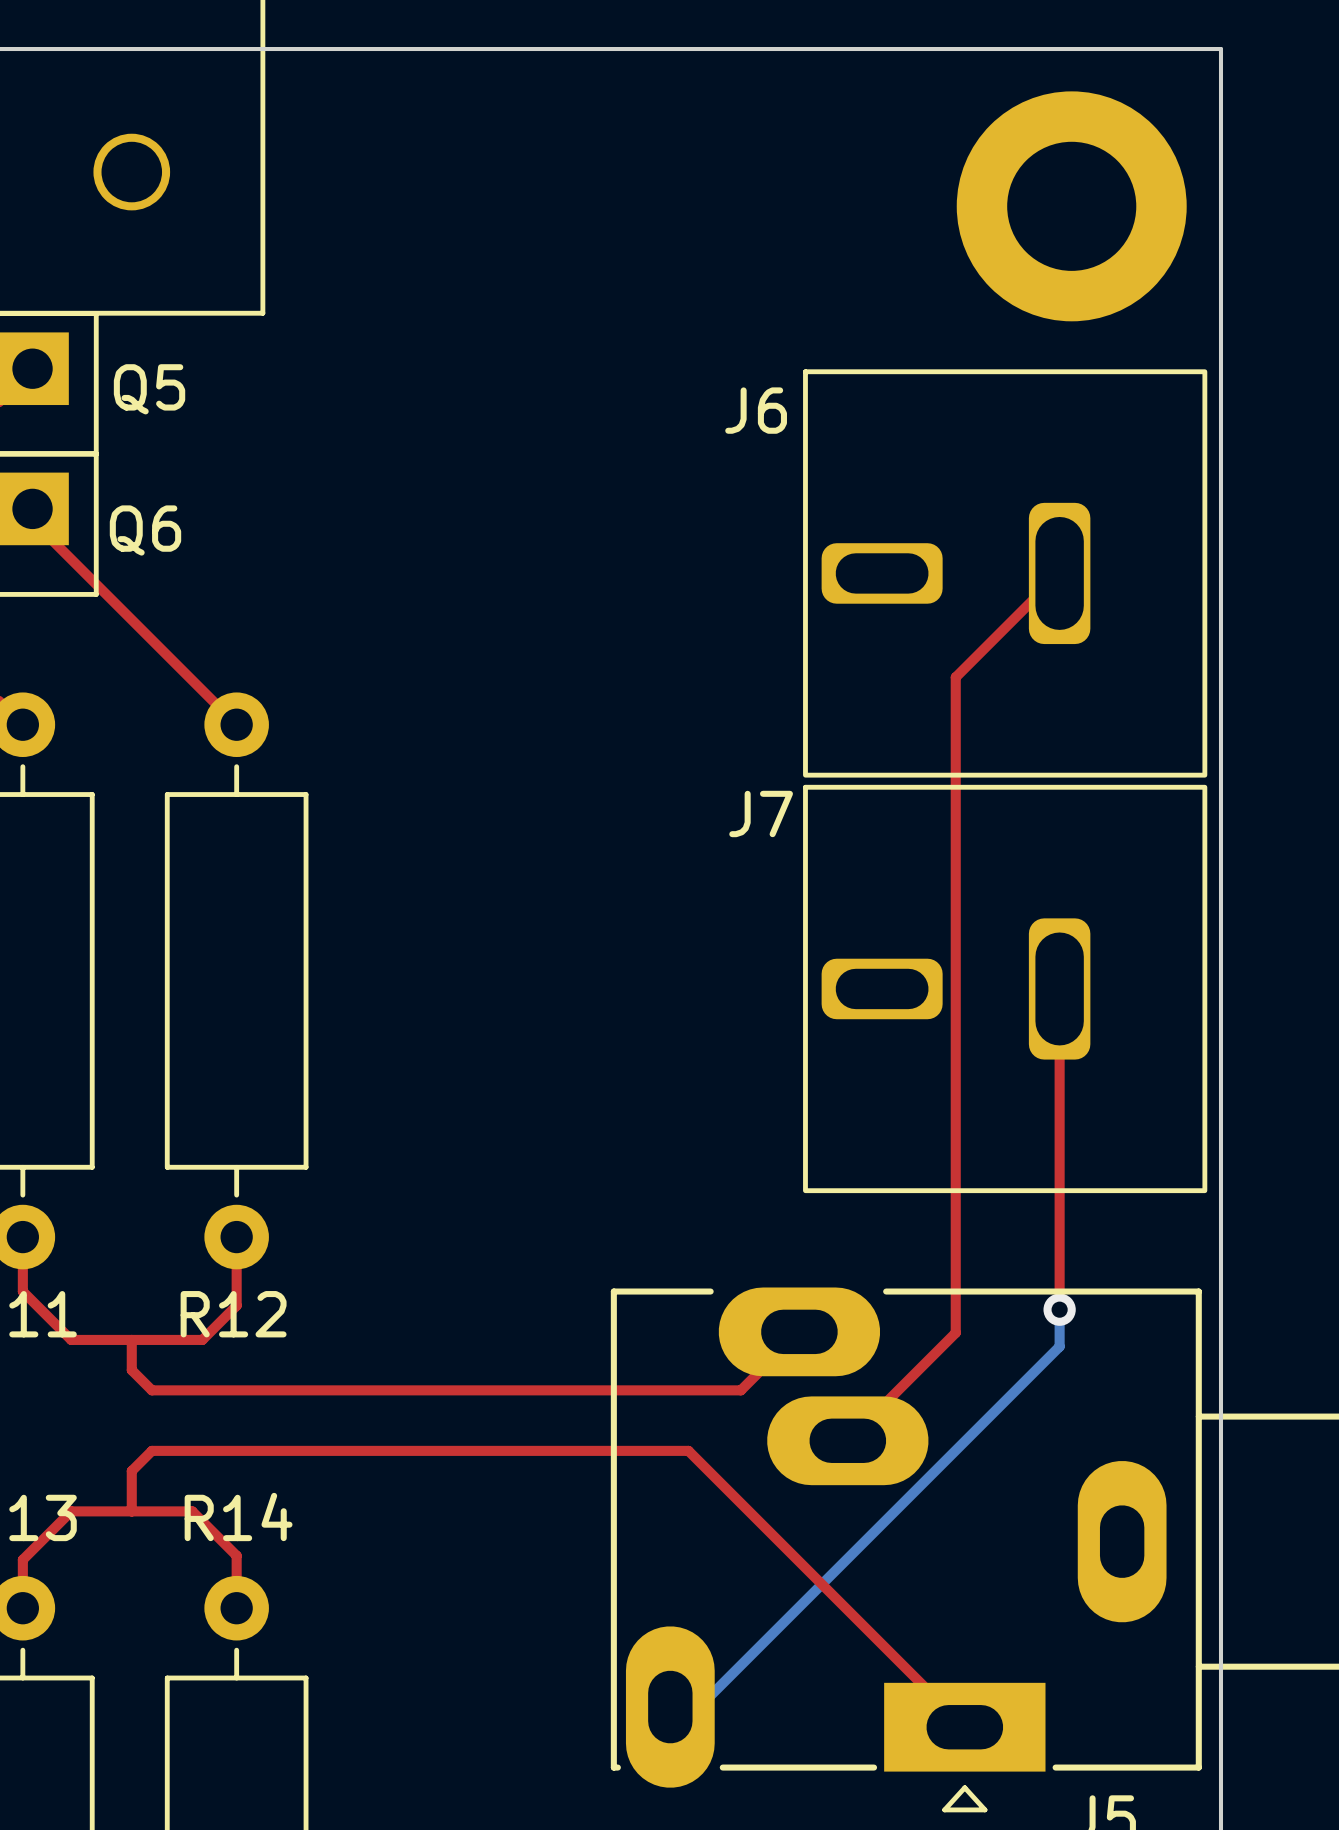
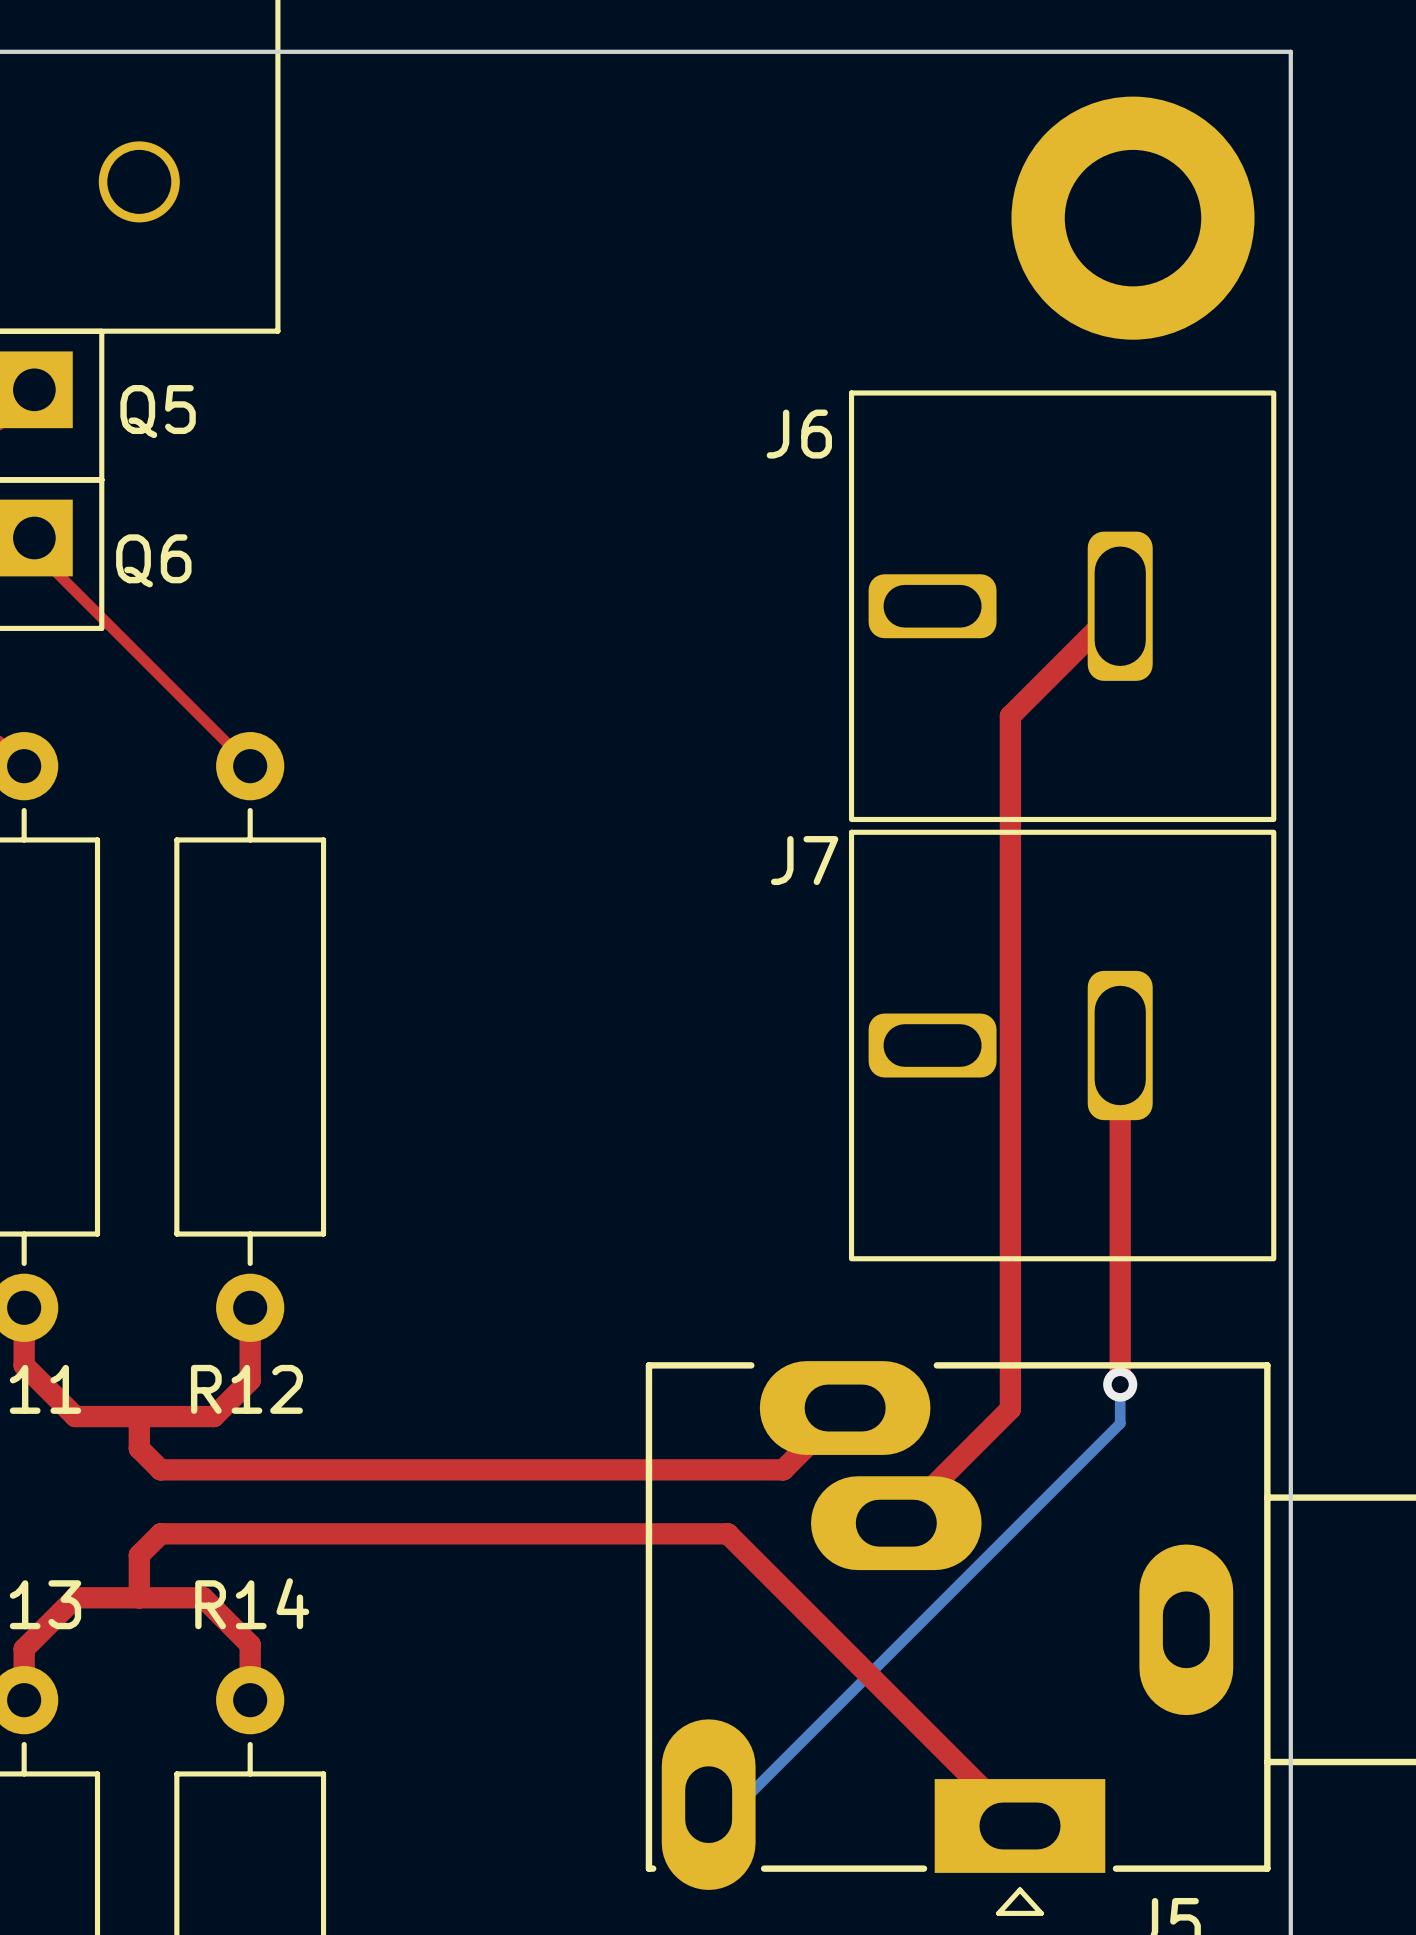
top track width: thin (1059, 573) (955, 677) (955, 1332) (847, 1440) -> thick (1120, 606) (1010, 716) (1010, 1409) (896, 1523)
top track width: thin (1059, 988) (1059, 1309) -> thick (1120, 1045) (1120, 1384)
top track width: thin (22, 1237) (22, 1291) (71, 1339) (202, 1339) (236, 1305) (236, 1237) -> thick (24, 1307) (24, 1365) (75, 1416) (213, 1416) (250, 1380) (250, 1307)
top track width: thin (799, 1331) (740, 1390) (151, 1390) (131, 1370) (131, 1339) -> thick (845, 1408) (783, 1469) (160, 1469) (139, 1448) (139, 1416)
top track width: thin (131, 1511) (131, 1471) (151, 1450) (688, 1450) (964, 1727) -> thick (139, 1597) (139, 1555) (160, 1533) (727, 1533) (1019, 1825)
top track width: thin (22, 1608) (22, 1559) (71, 1511) (192, 1511) (236, 1555) (236, 1608) -> thick (24, 1700) (24, 1648) (75, 1597) (203, 1597) (250, 1644) (250, 1700)

